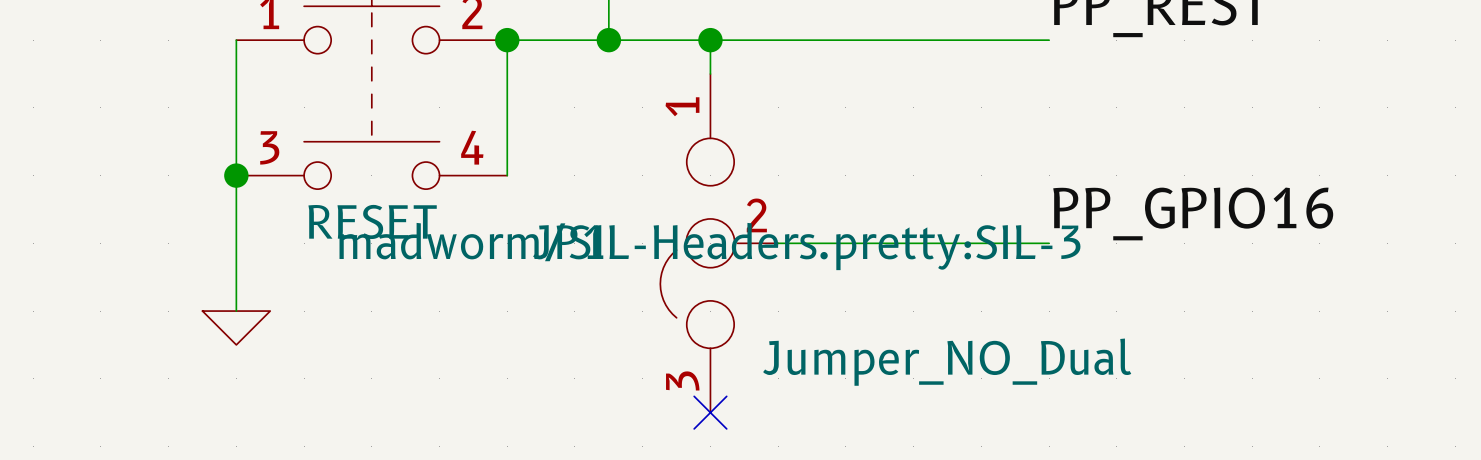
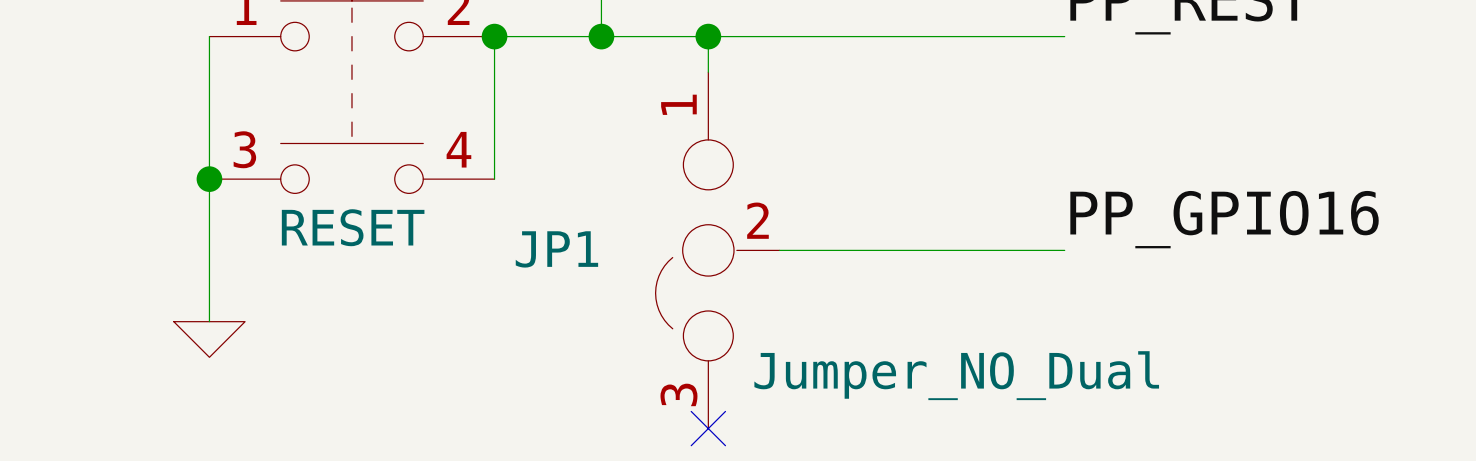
JP1 text: madworm/SIL-Headers.pretty:SIL-3 (709, 246) -> none

